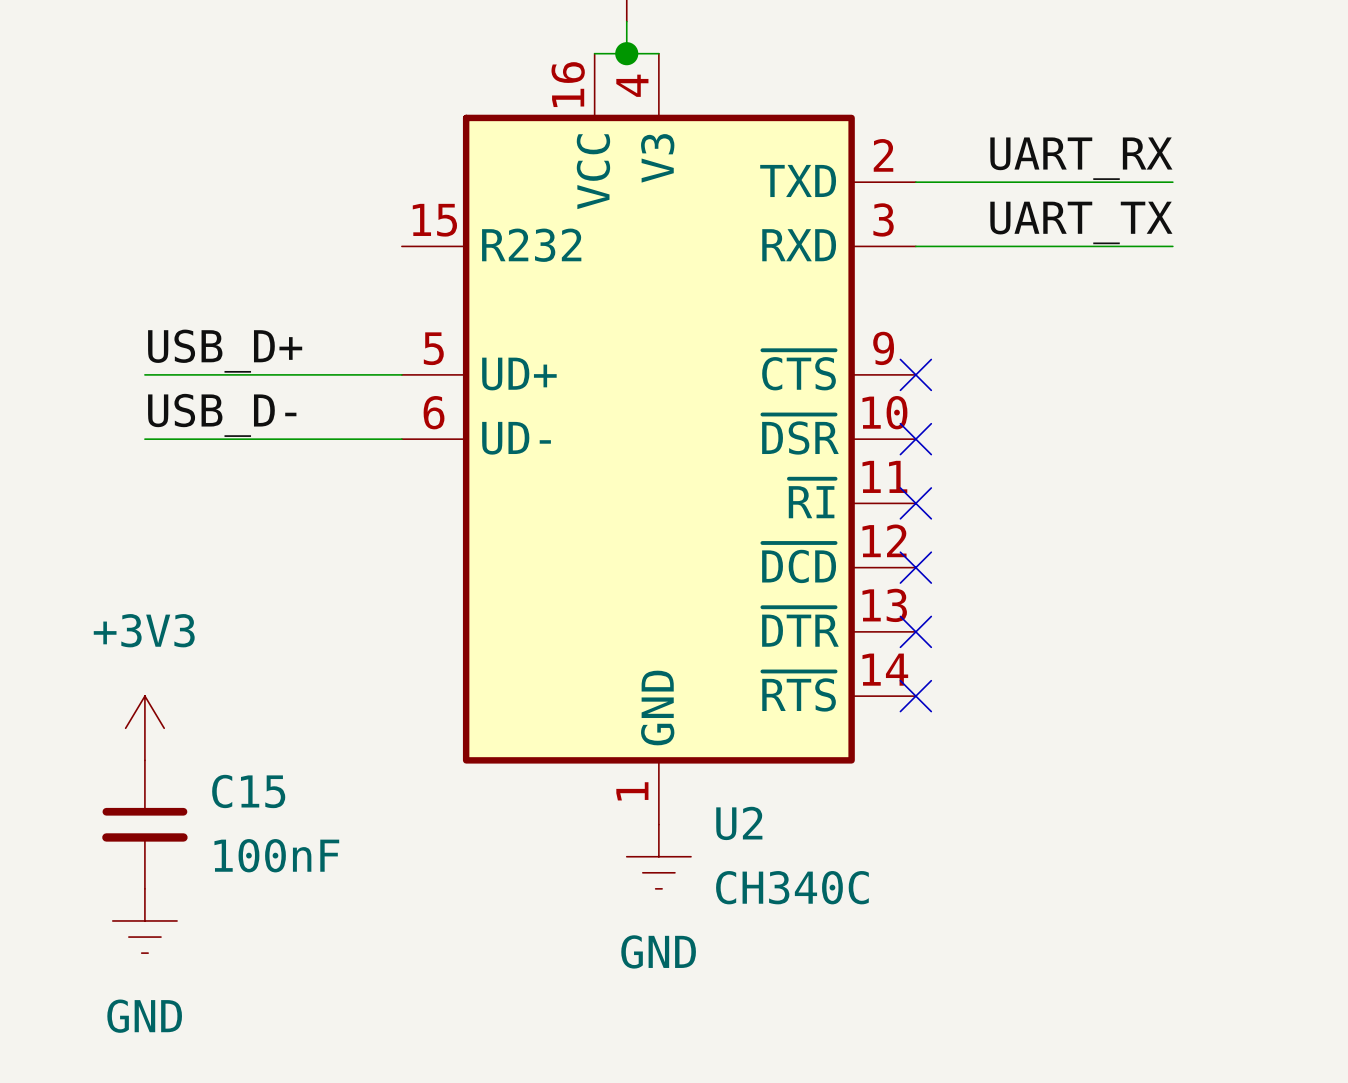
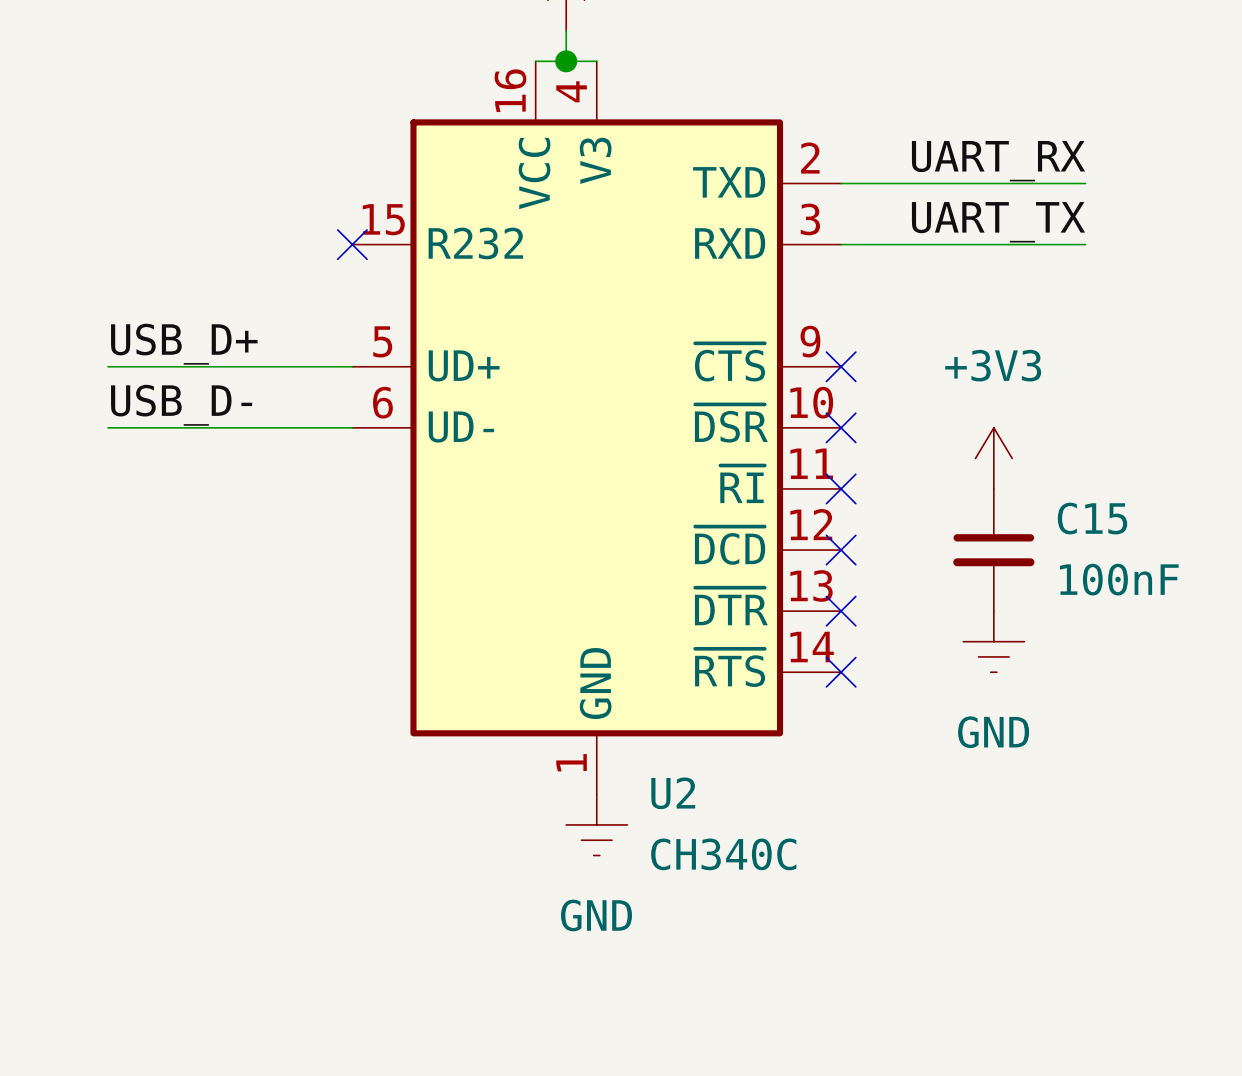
no-connect mark: none -> (352, 244)
power symbol: none -> +3V3 (993, 458)
power symbol: none -> GND (993, 641)
power symbol: +3V3 (144, 728) -> none
C15 position: (144, 824) -> (993, 550)
power symbol: GND (144, 920) -> none

